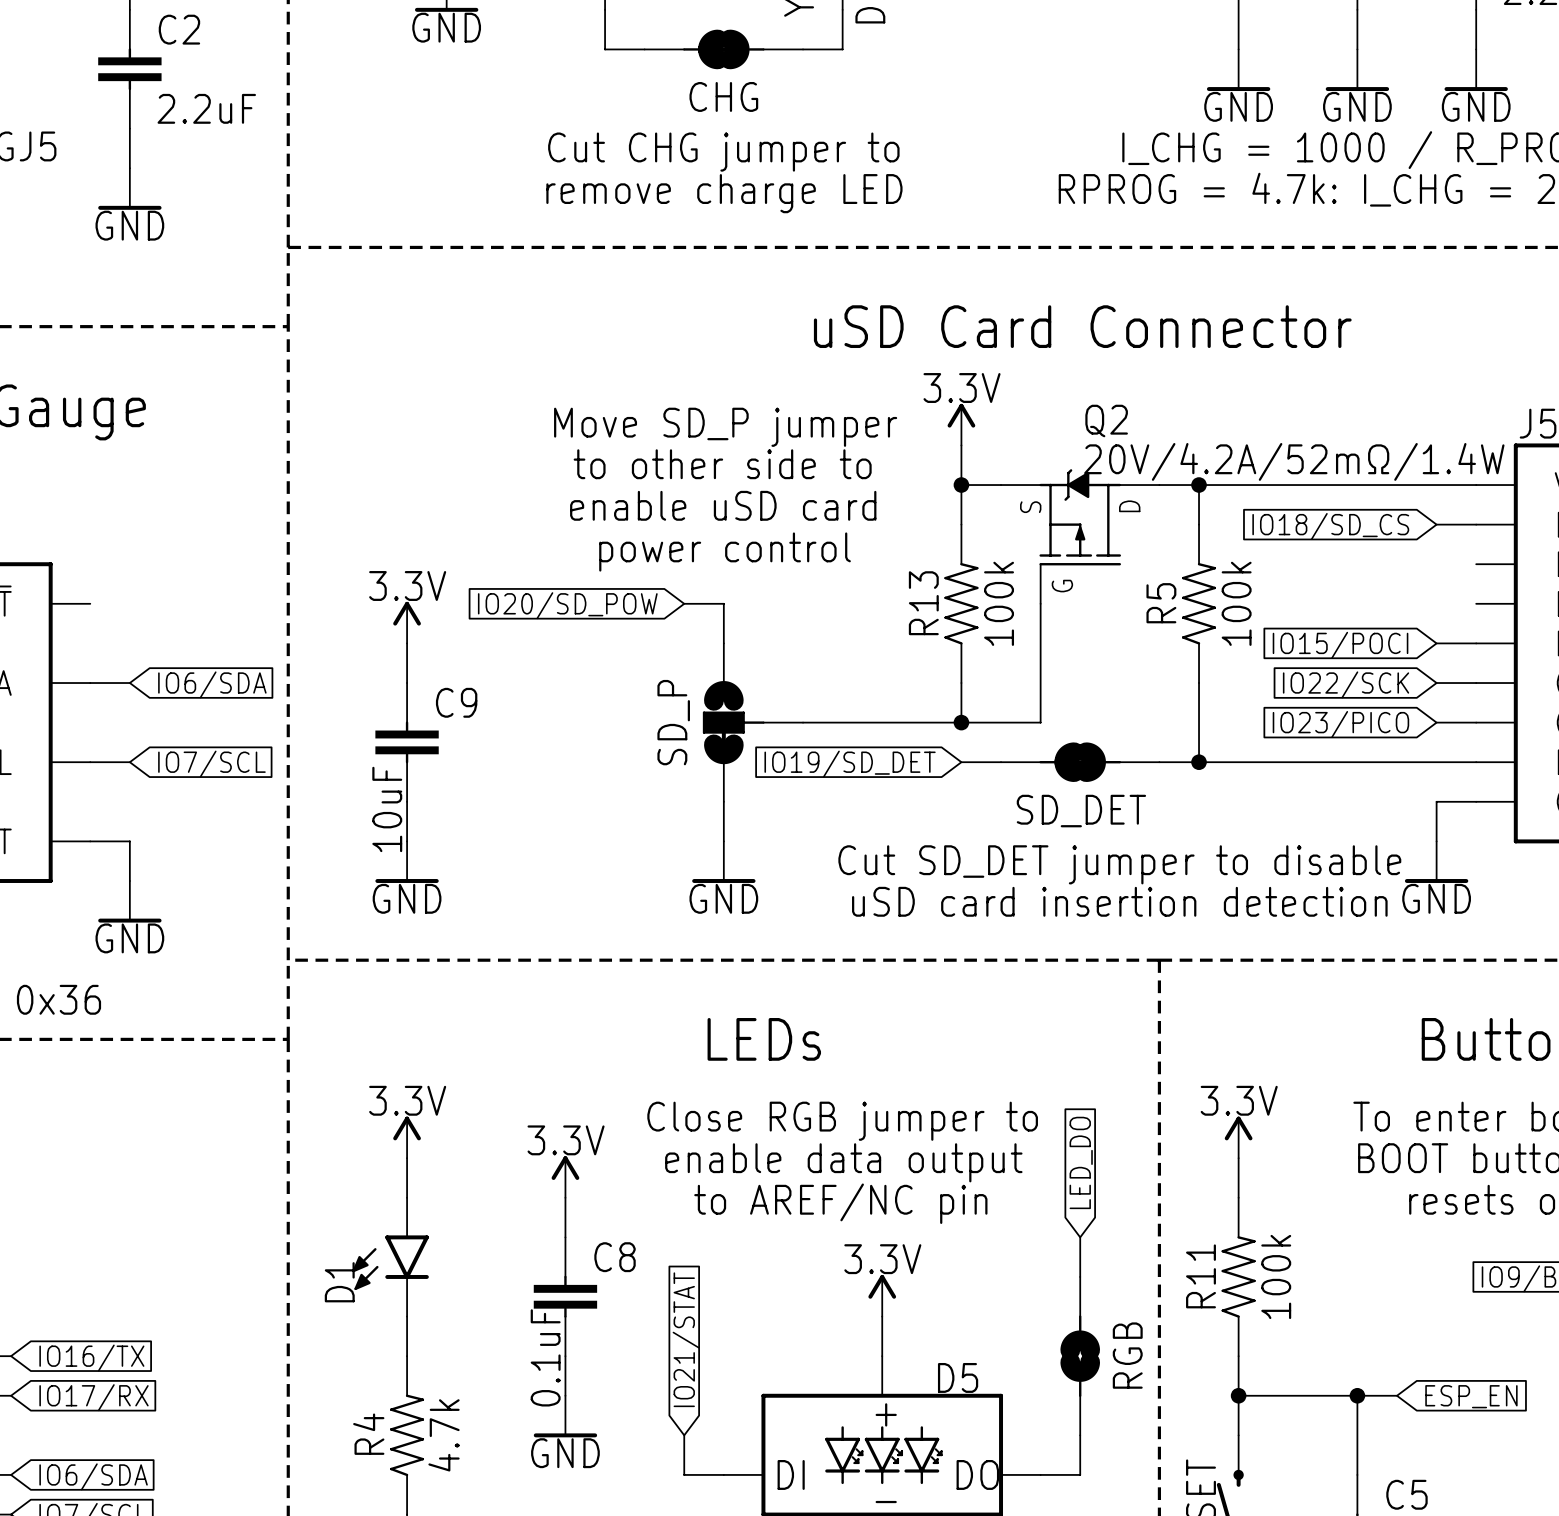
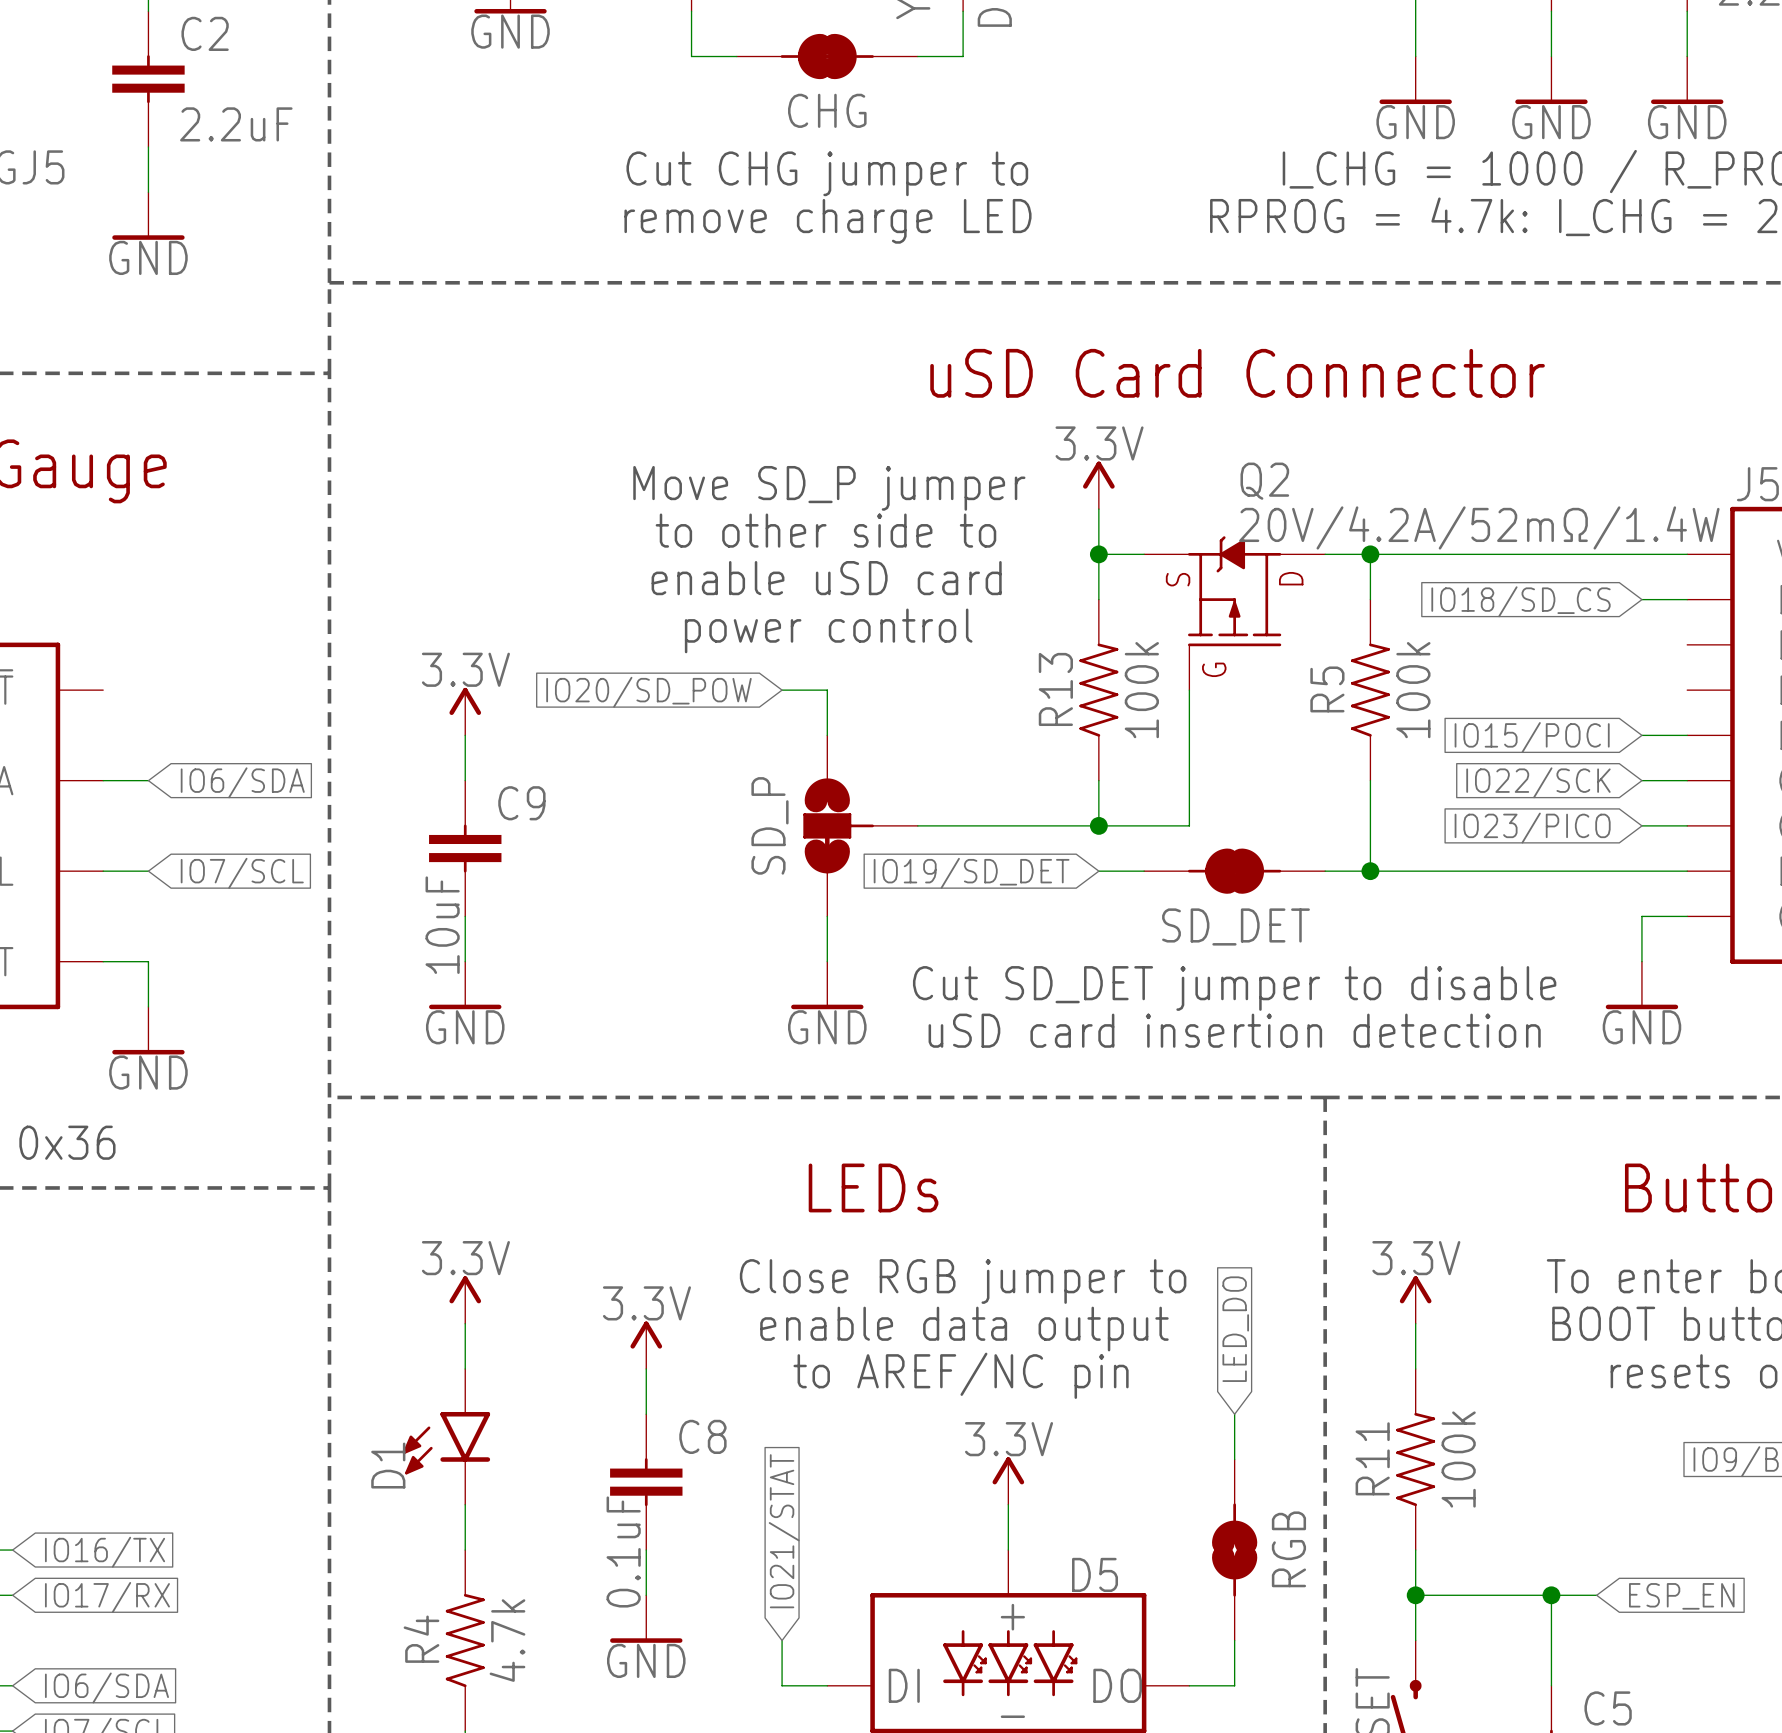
text position: Cut SD_DET jumper to disable (1119, 864) -> Cut SD_DET jumper to disable (1234, 988)
text position: uSD card insertion detection (1119, 901) -> uSD card insertion detection (1234, 1030)

